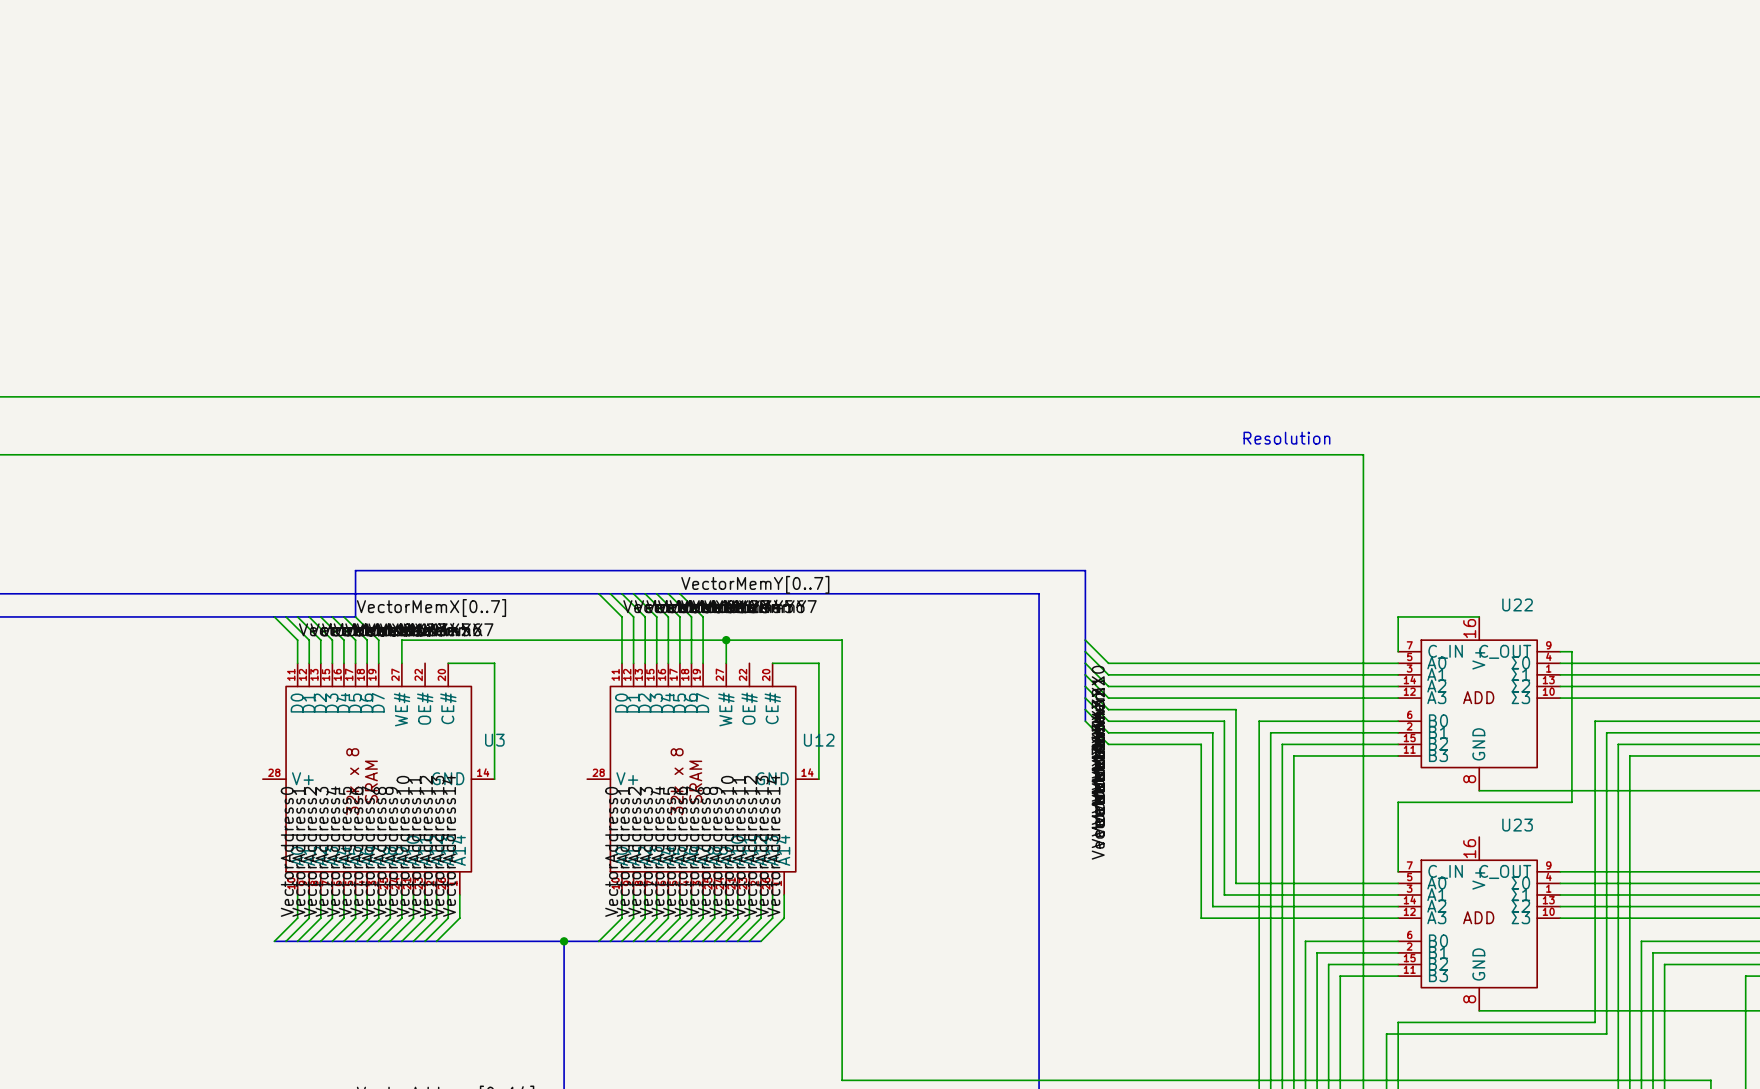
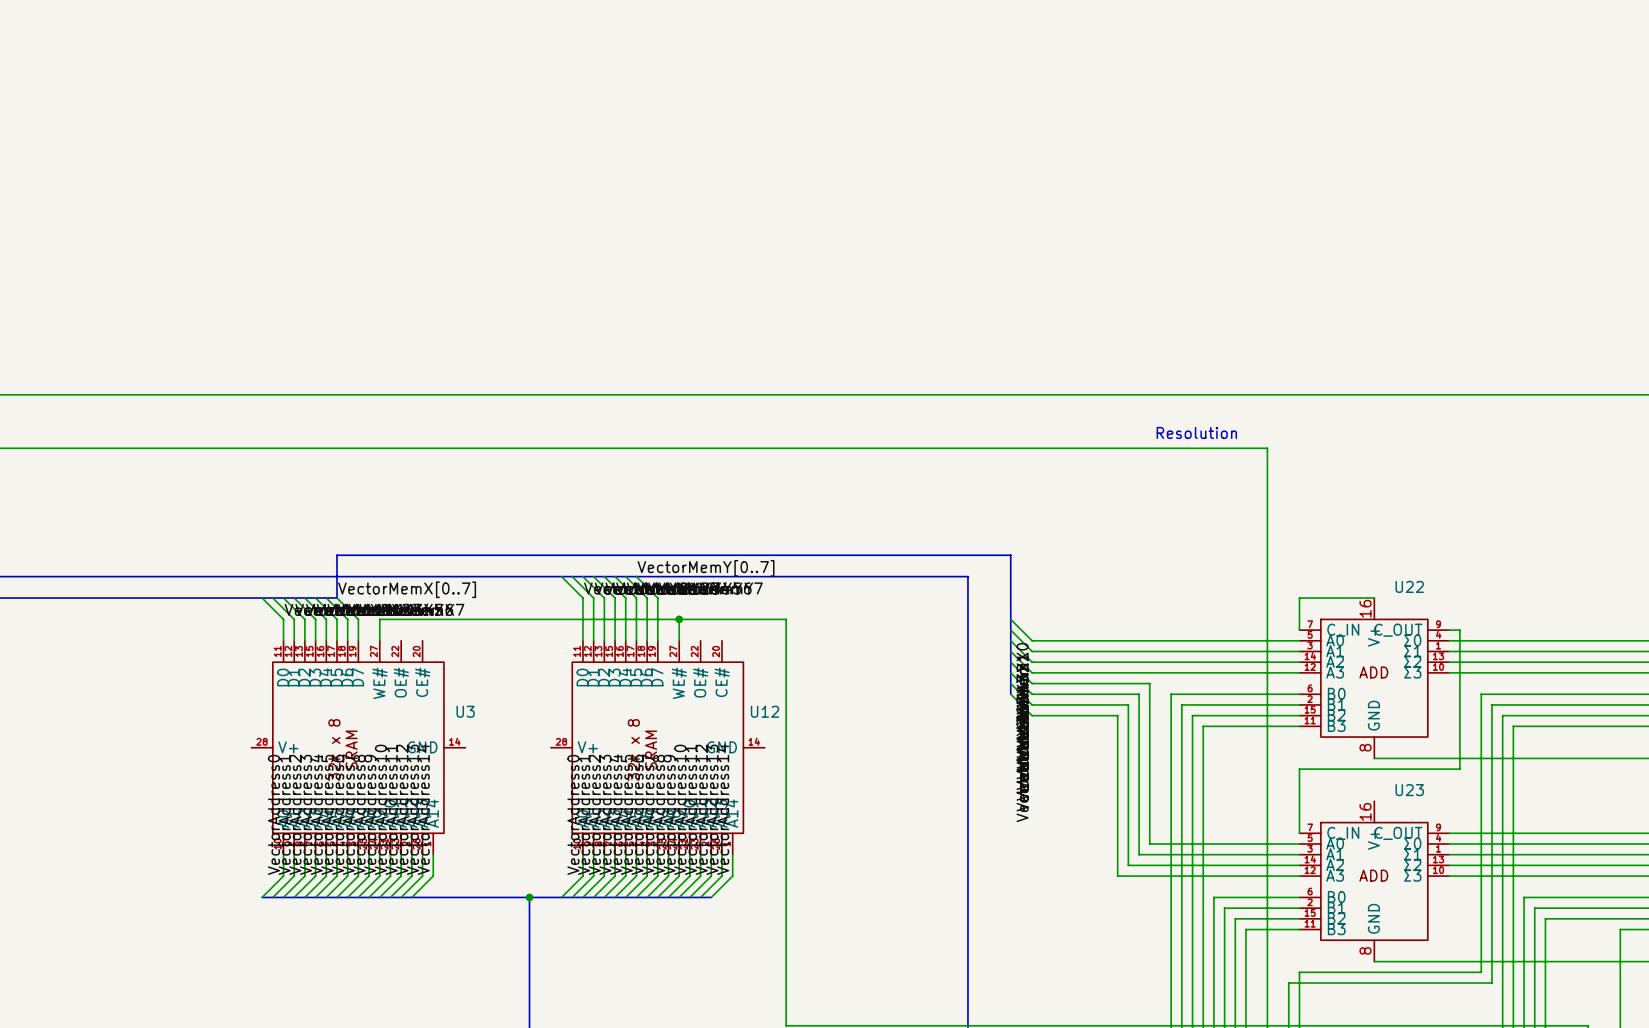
wire: (448, 663) (494, 663) (494, 779) -> none
wire: (772, 663) (818, 663) (818, 779) -> none

